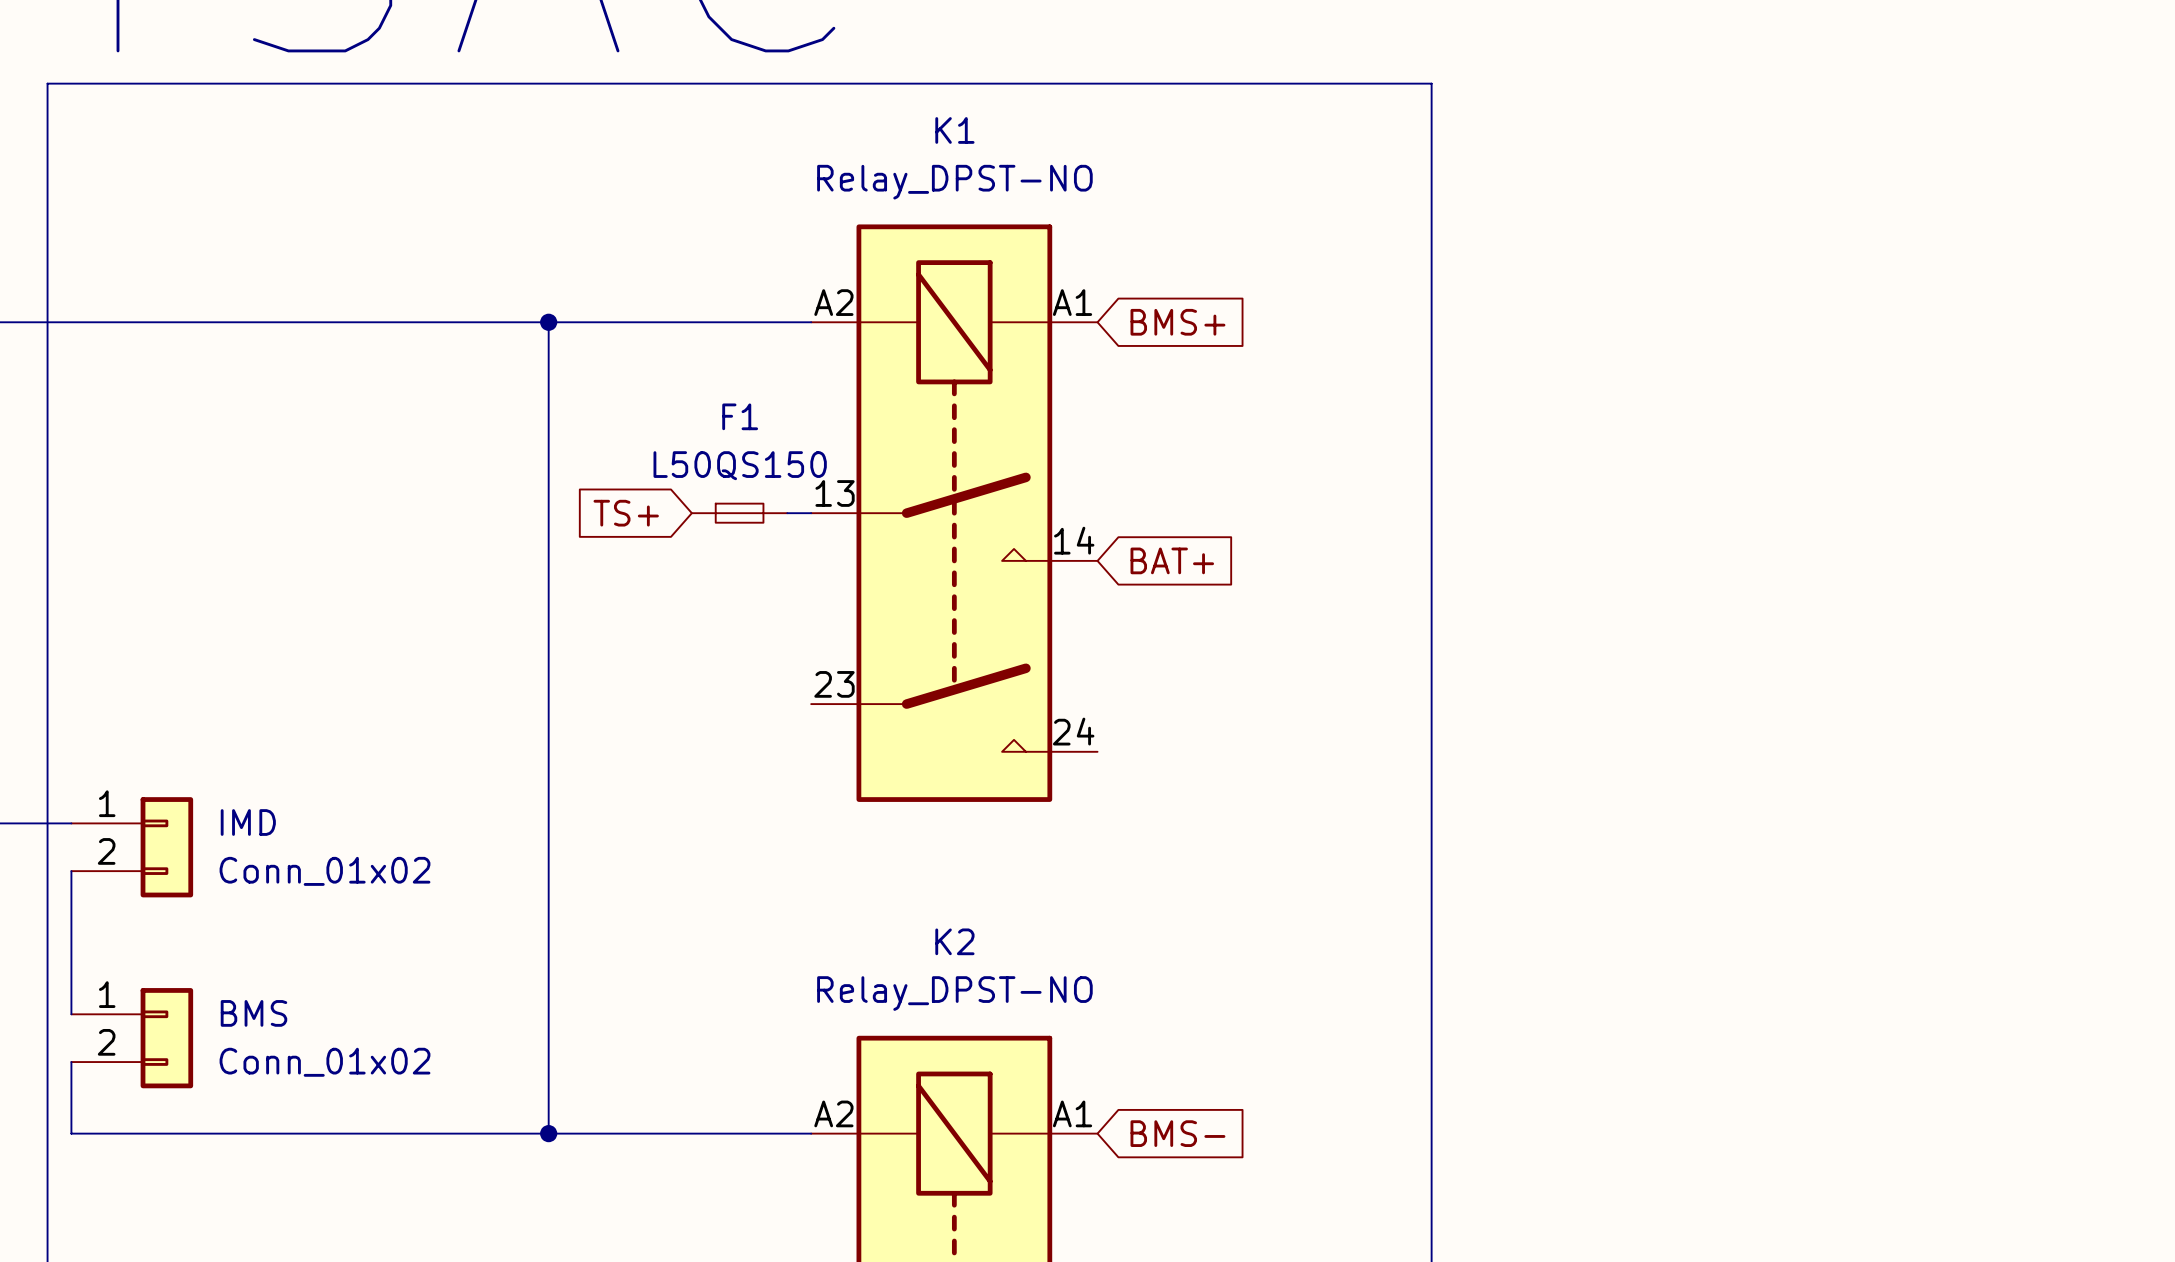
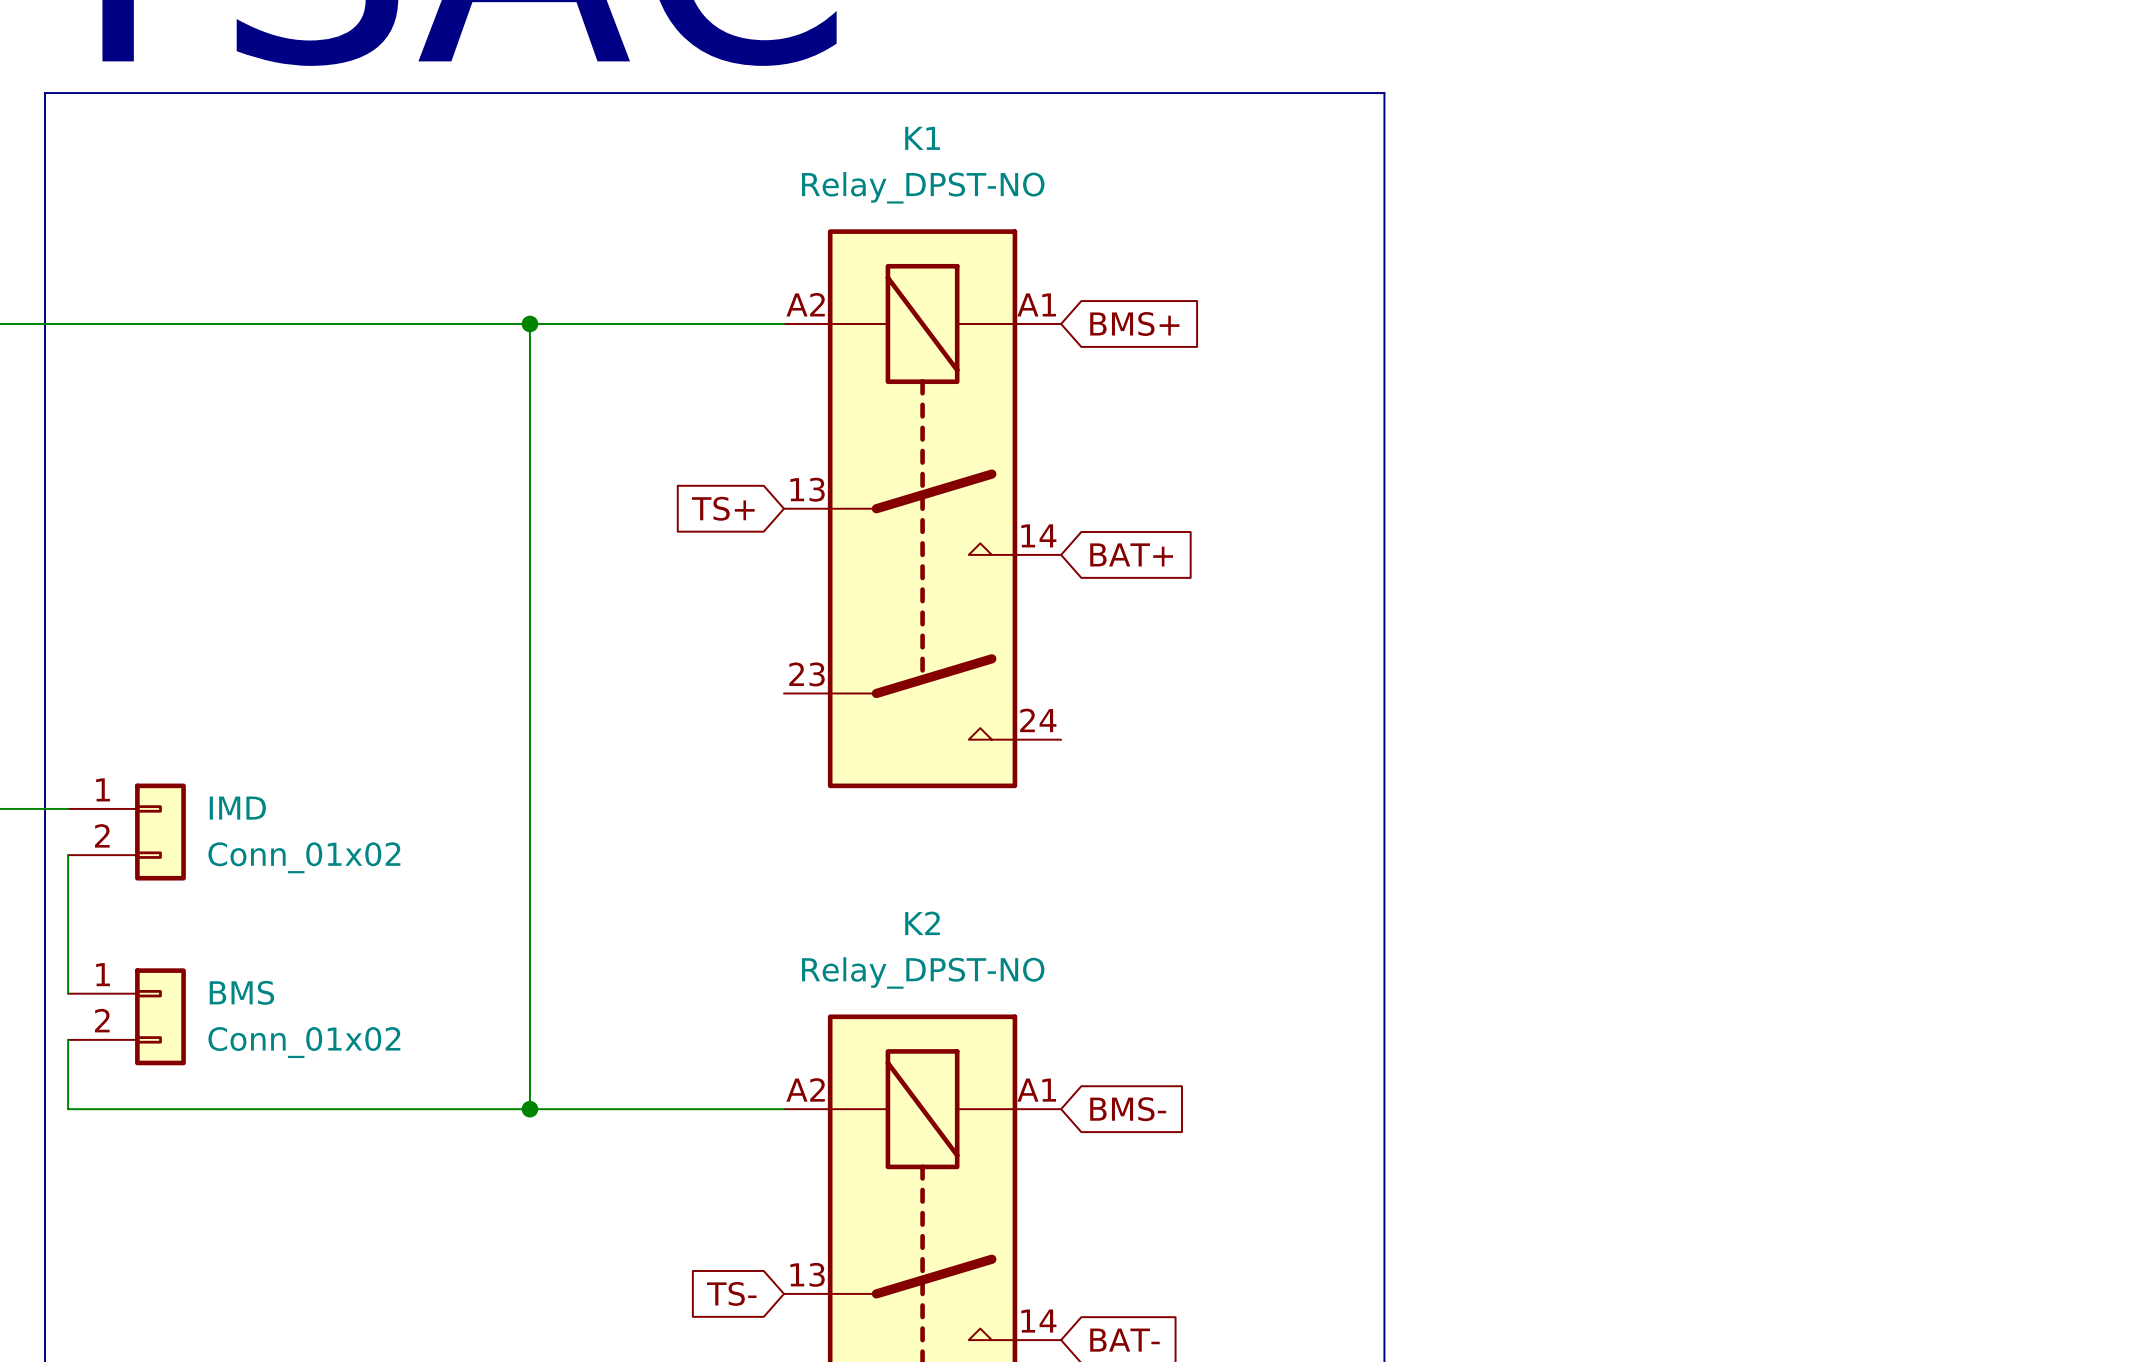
global label position: TS+ (626, 513) -> TS+ (723, 508)
F1: L50QS150 (739, 513) -> none
wire: (787, 513) (811, 513) -> none

